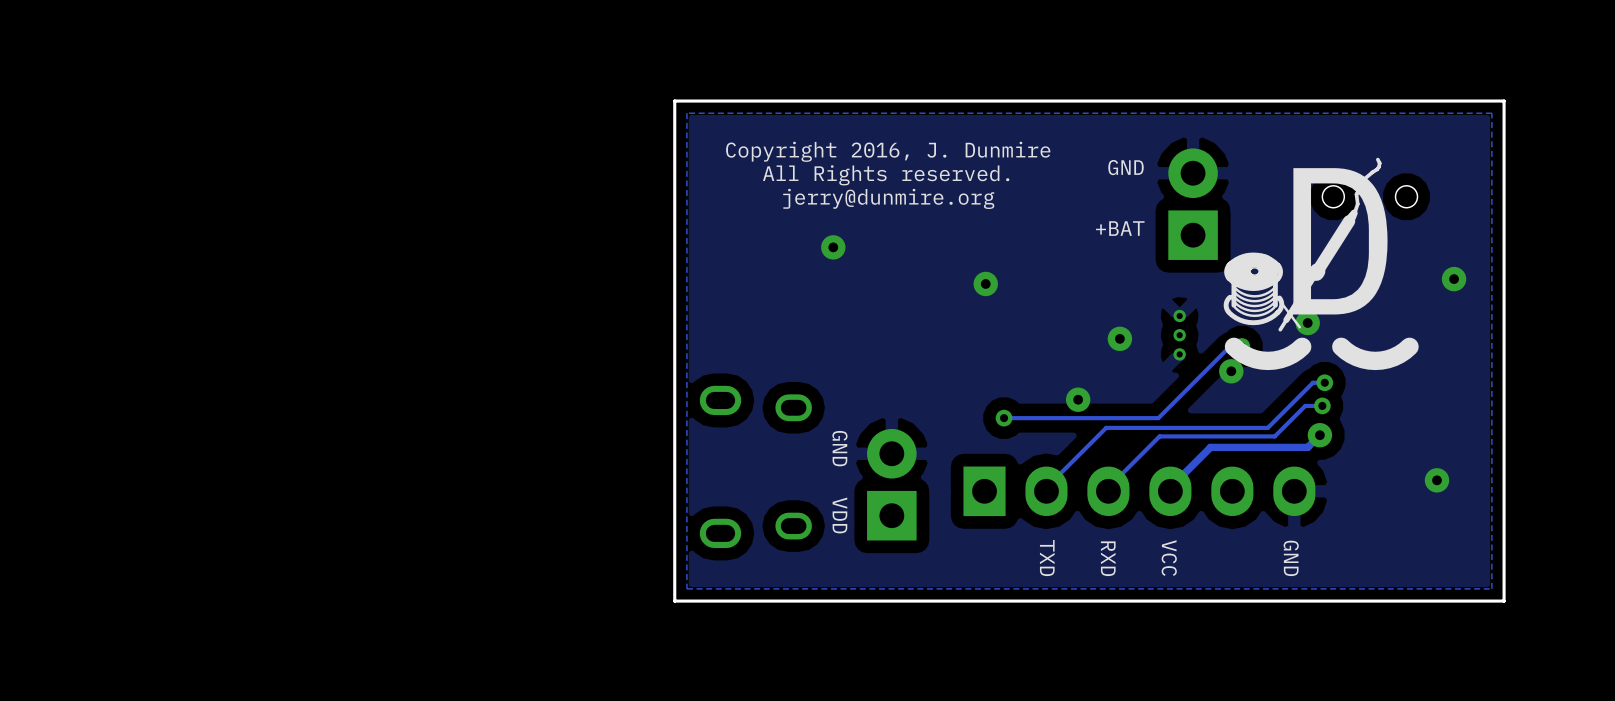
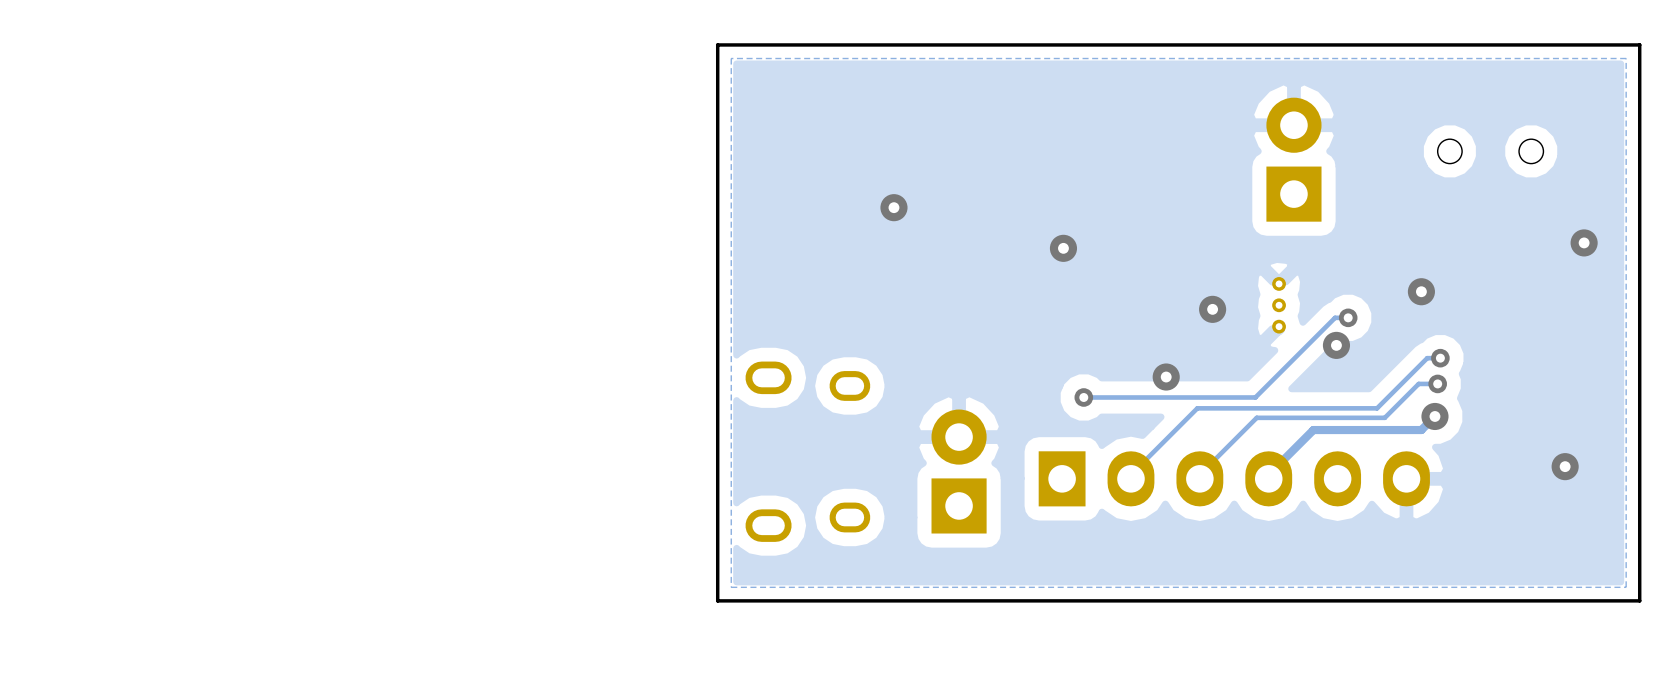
text: Copyright 2016, J. Dunmire (888, 151) -> none
drawing: [1223, 157, 1419, 371] -> none
text: GND (1126, 167) -> none
text: All Rights reserved. (886, 175) -> none
text: jerry@dunmire.org (888, 198) -> none
text: +BAT (1120, 228) -> none
text: GND (839, 448) -> none
text: VDD (839, 515) -> none
text: TXD (1047, 558) -> none
text: RXD (1108, 558) -> none
text: VCC (1169, 558) -> none
text: GND (1291, 558) -> none

